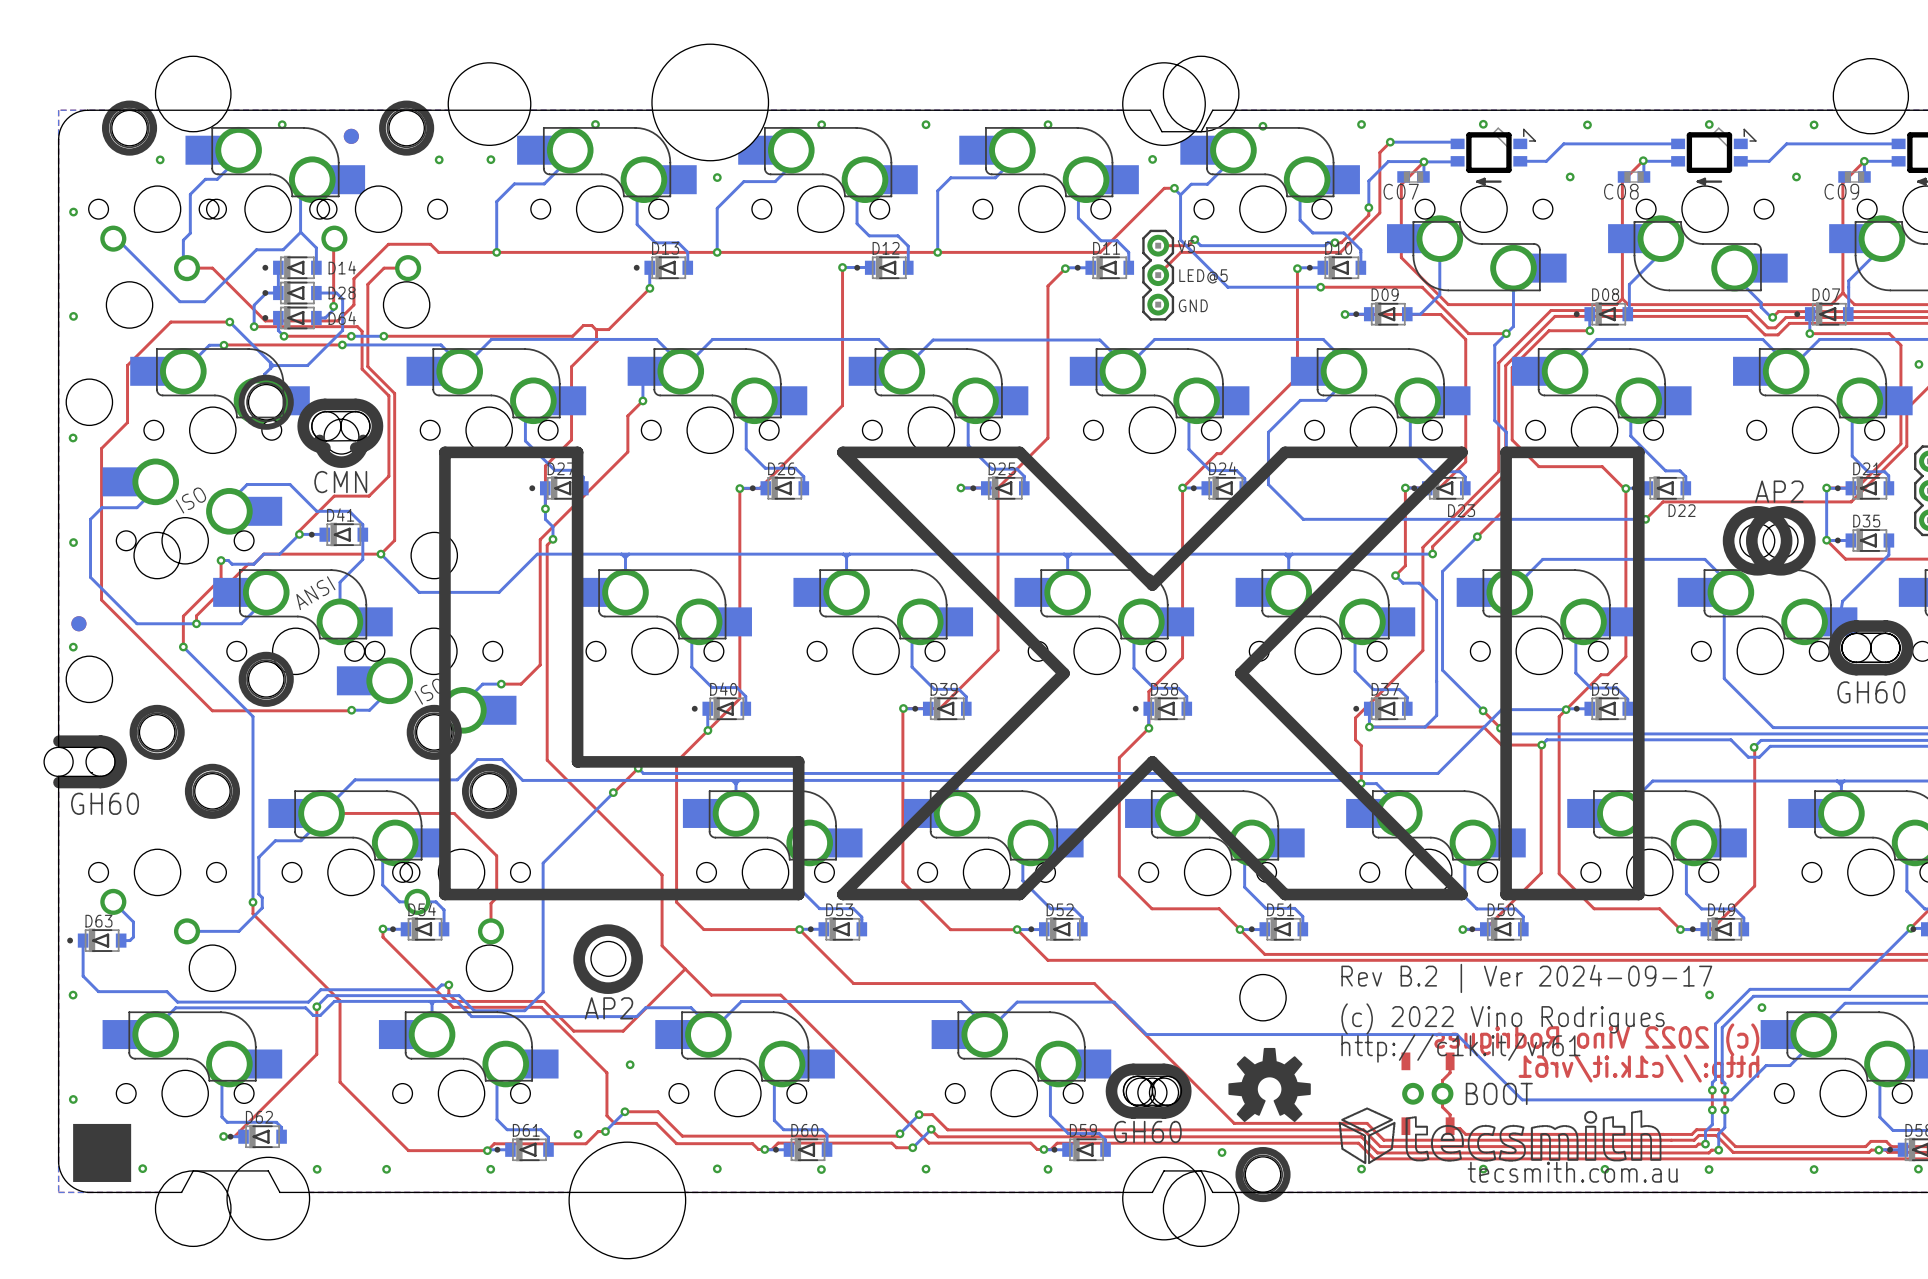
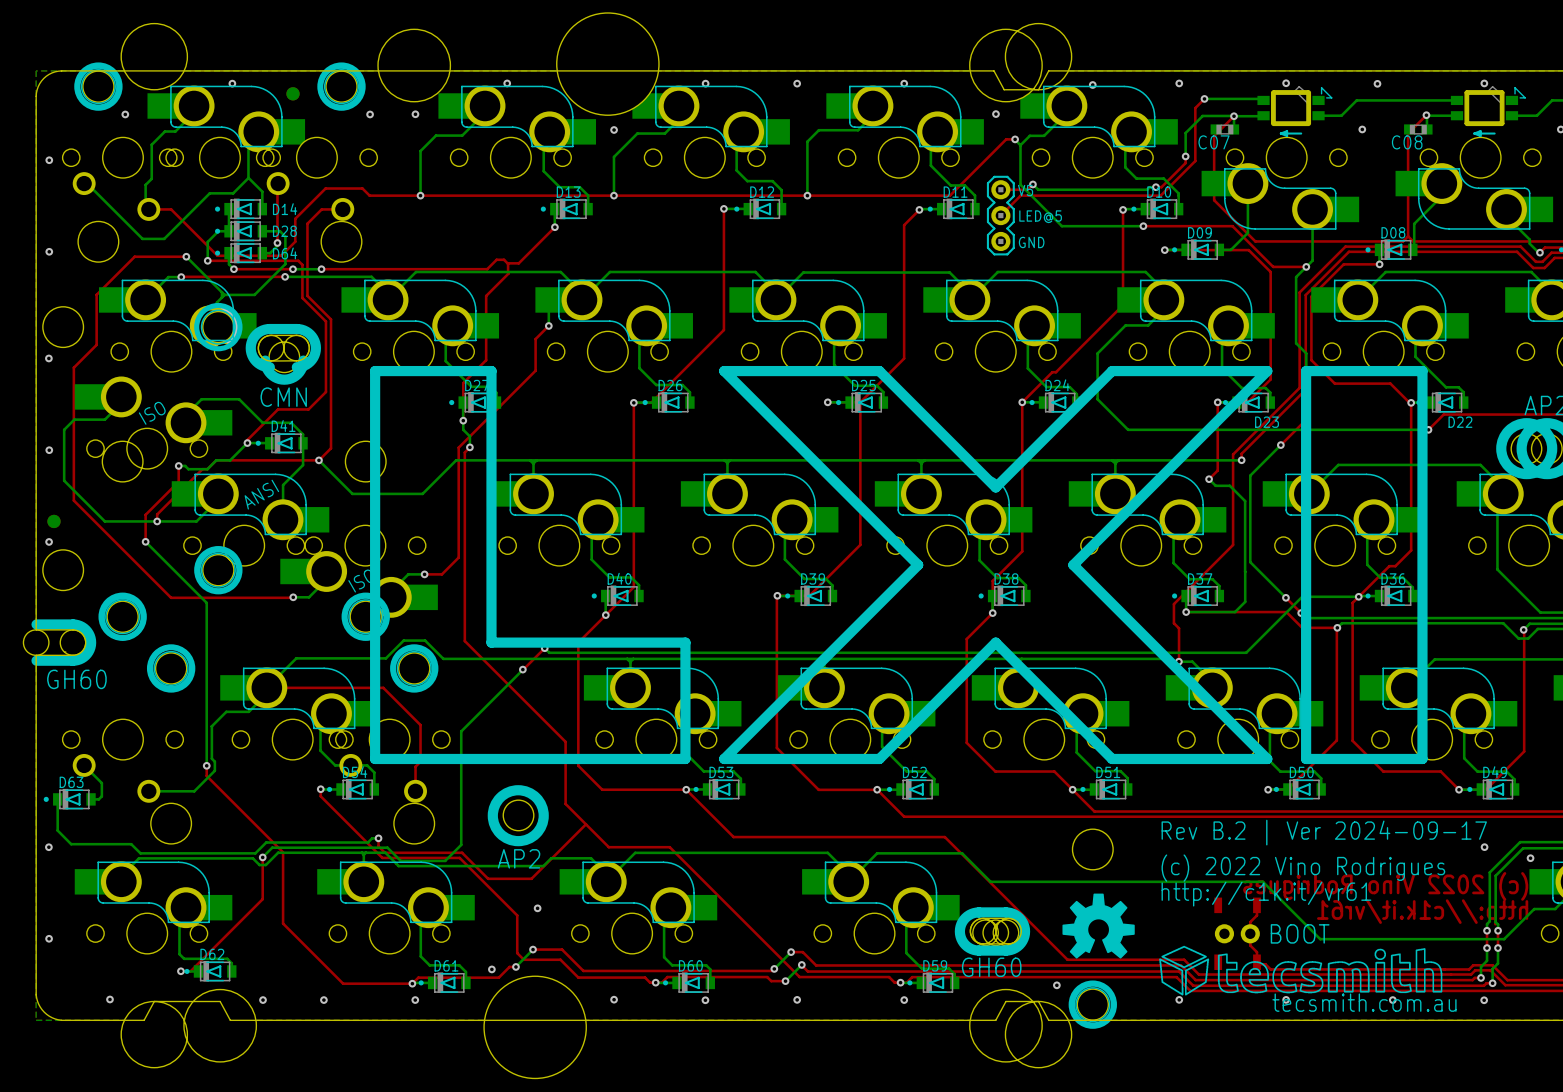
drawing: [73, 1123, 132, 1182] -> none

